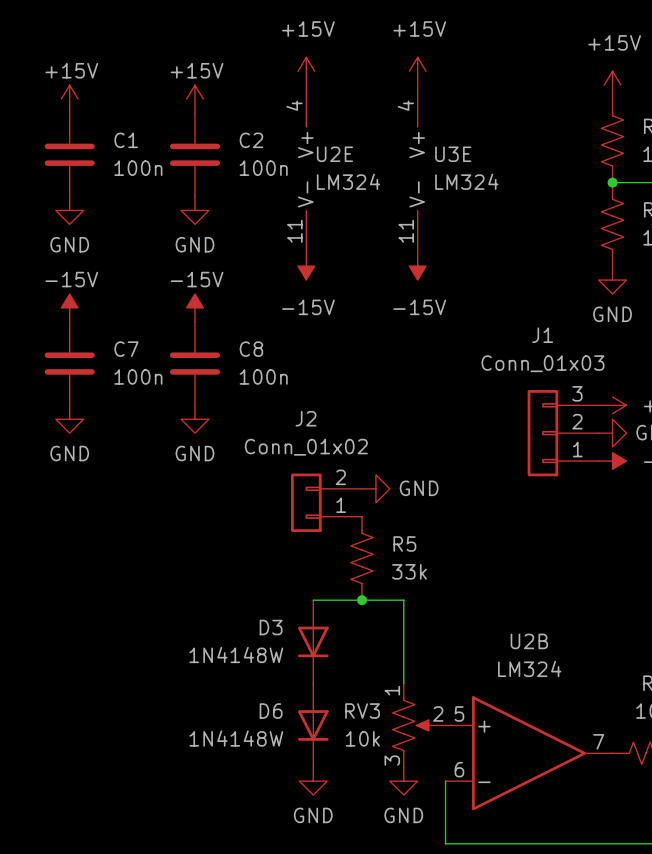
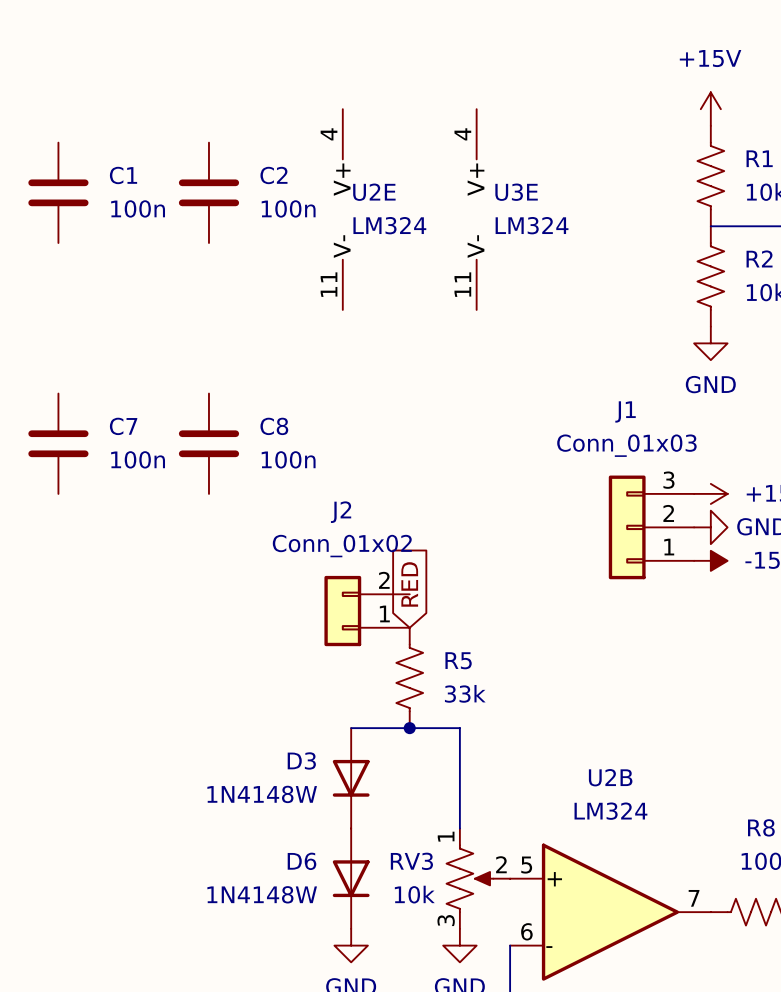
power symbol: +15V (306, 71) -> none
power symbol: +15V (417, 71) -> none
power symbol: +15V (69, 99) -> none
power symbol: +15V (194, 99) -> none
junction: (612, 182) -> none
power symbol: GND (69, 210) -> none
power symbol: GND (194, 210) -> none
power symbol: -15V (306, 266) -> none
power symbol: -15V (417, 266) -> none
power symbol: -15V (69, 307) -> none
power symbol: -15V (194, 307) -> none
power symbol: GND (69, 419) -> none
power symbol: GND (194, 419) -> none
global label: none -> RED (409, 584)
power symbol: GND (375, 488) -> none

